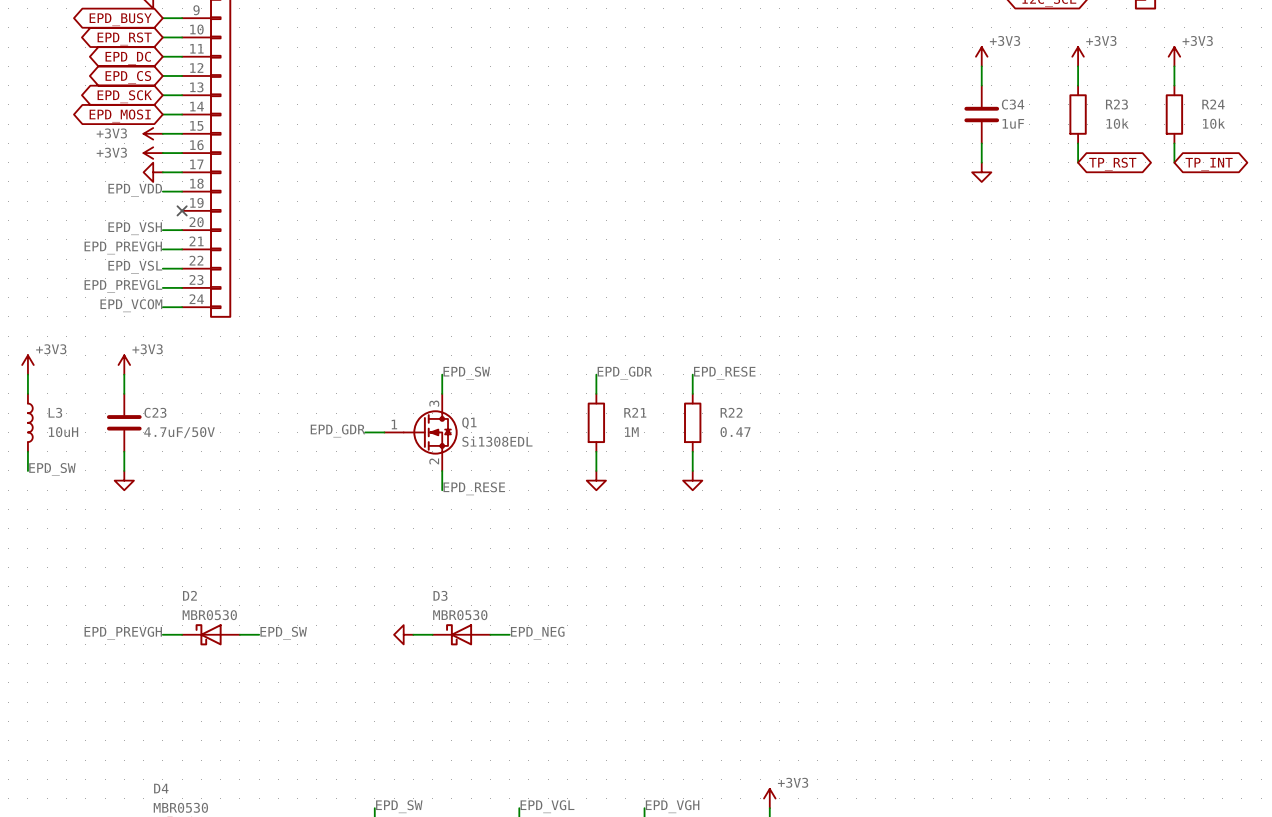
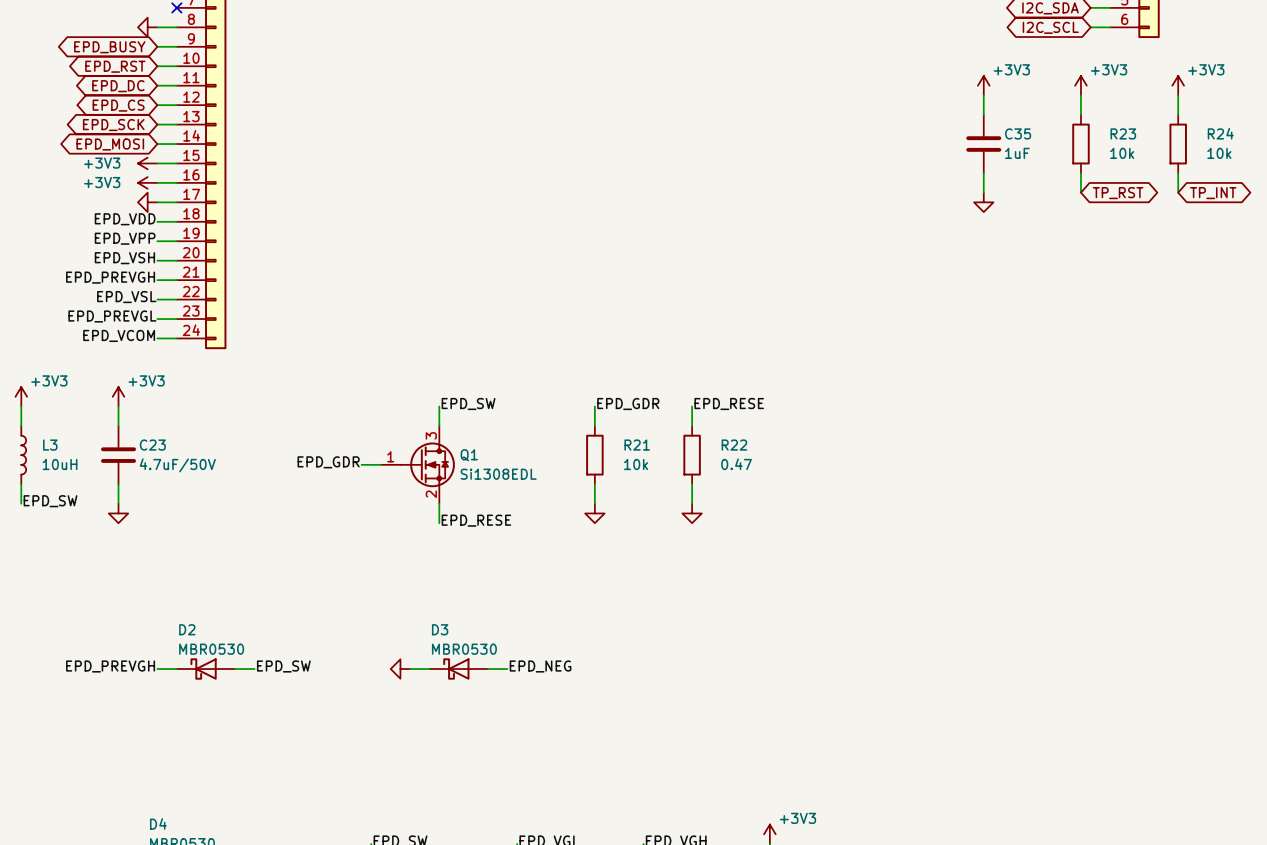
C34 name: C34 (1013, 104) -> C35 (1018, 133)
label: none -> EPD_VPP (125, 238)
wire: none -> (157, 241) (176, 241)
no-connect mark: (182, 210) -> none
R21 value: 1M (631, 432) -> 10k (636, 464)

